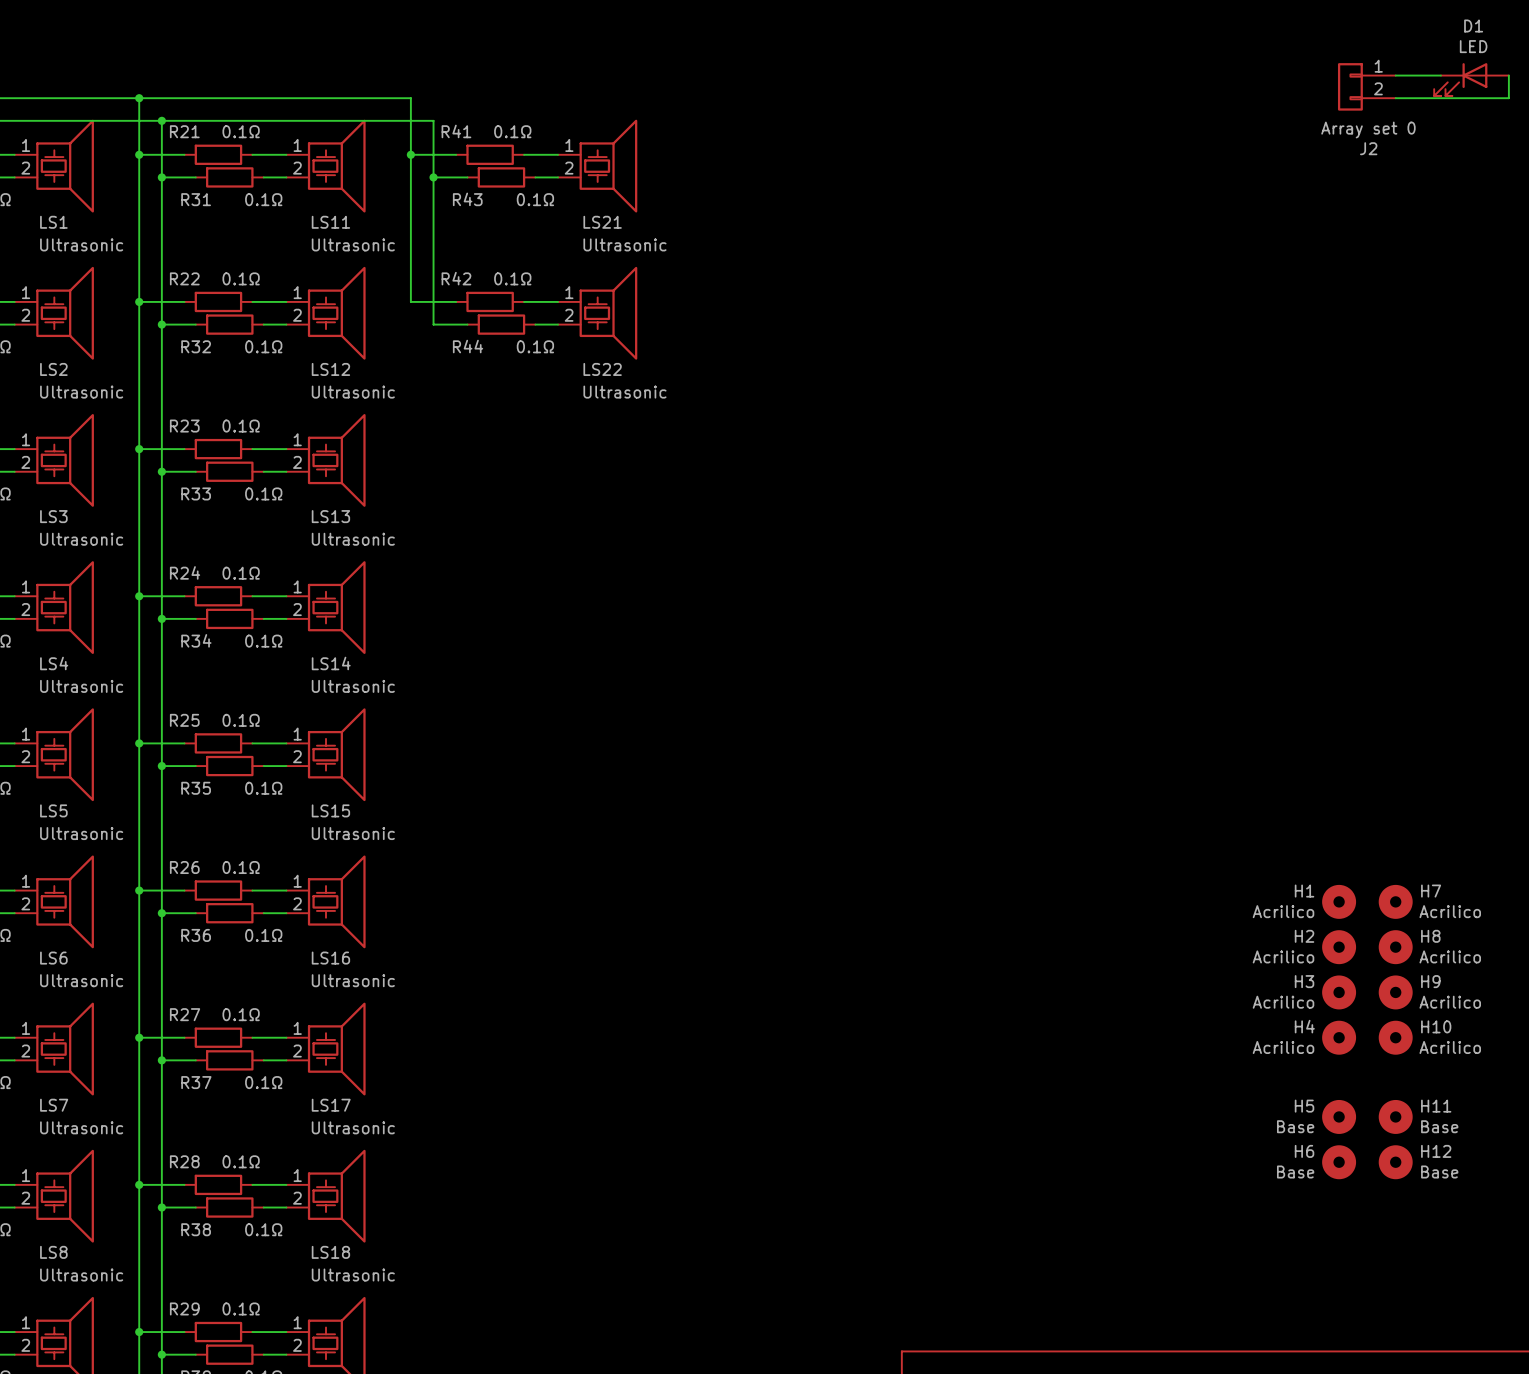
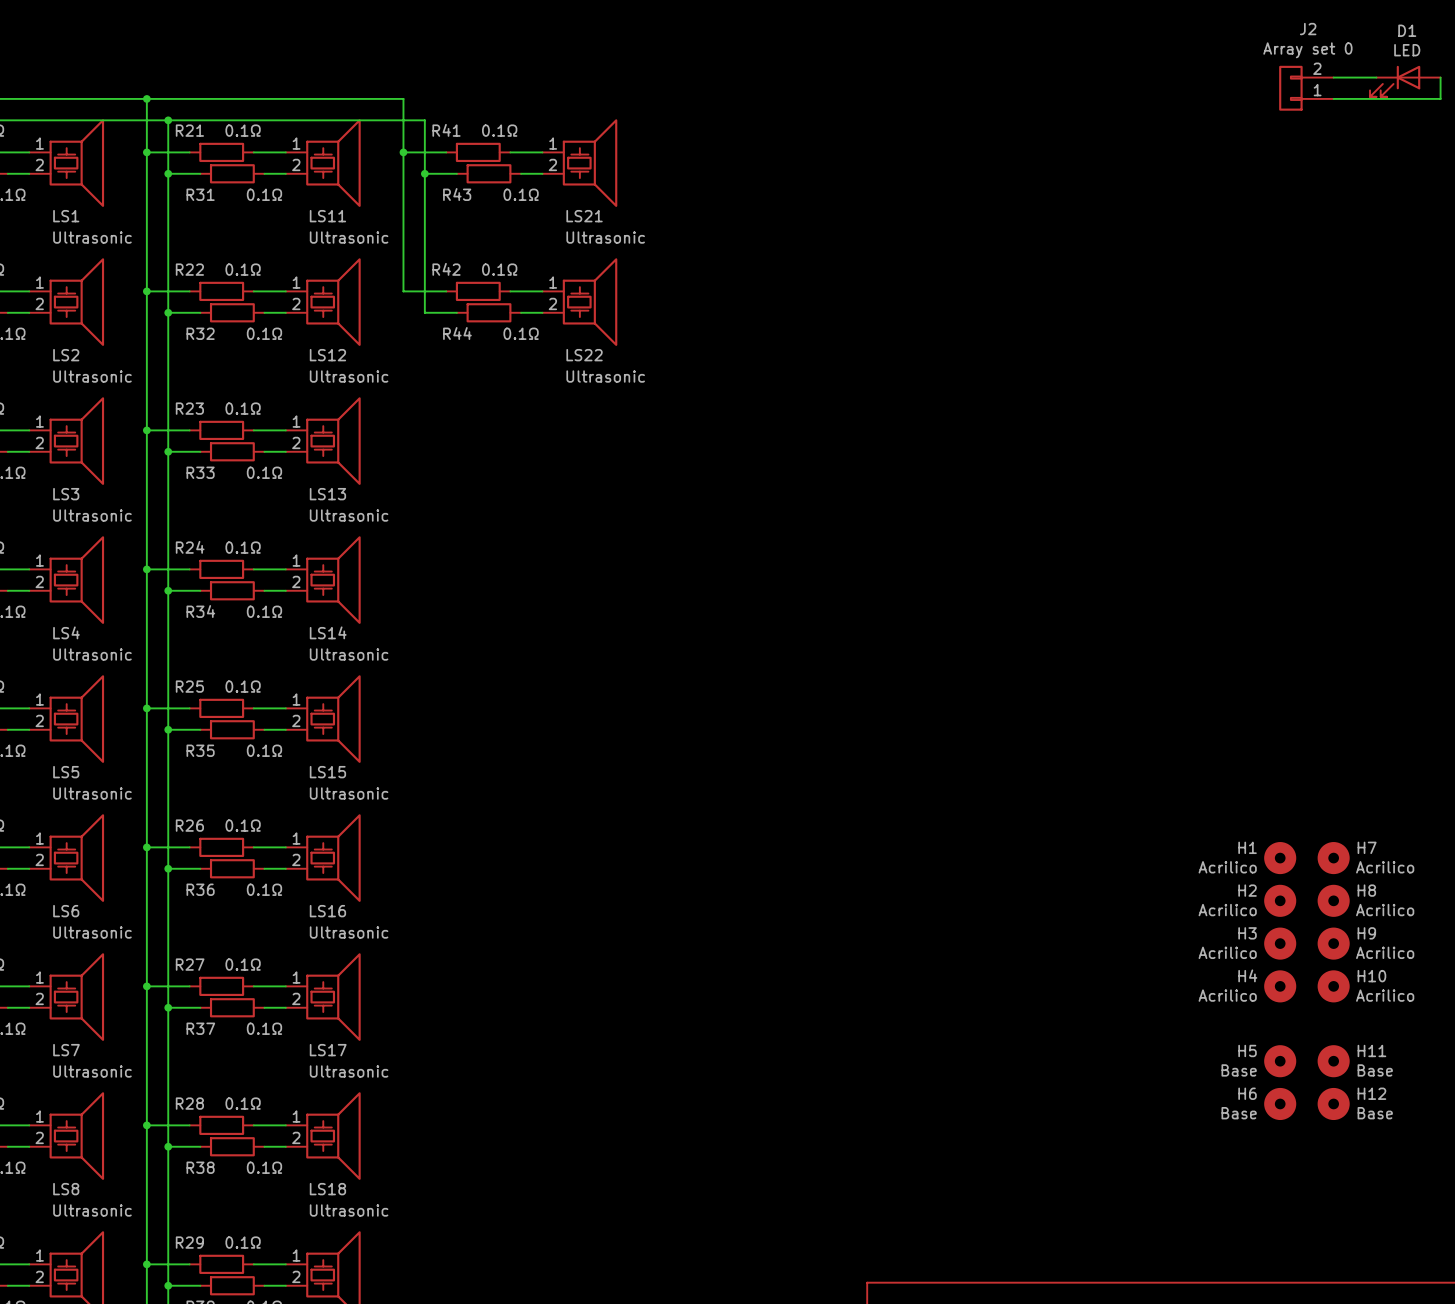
J2 flip: as is (1350, 86) -> up-down (1290, 88)

